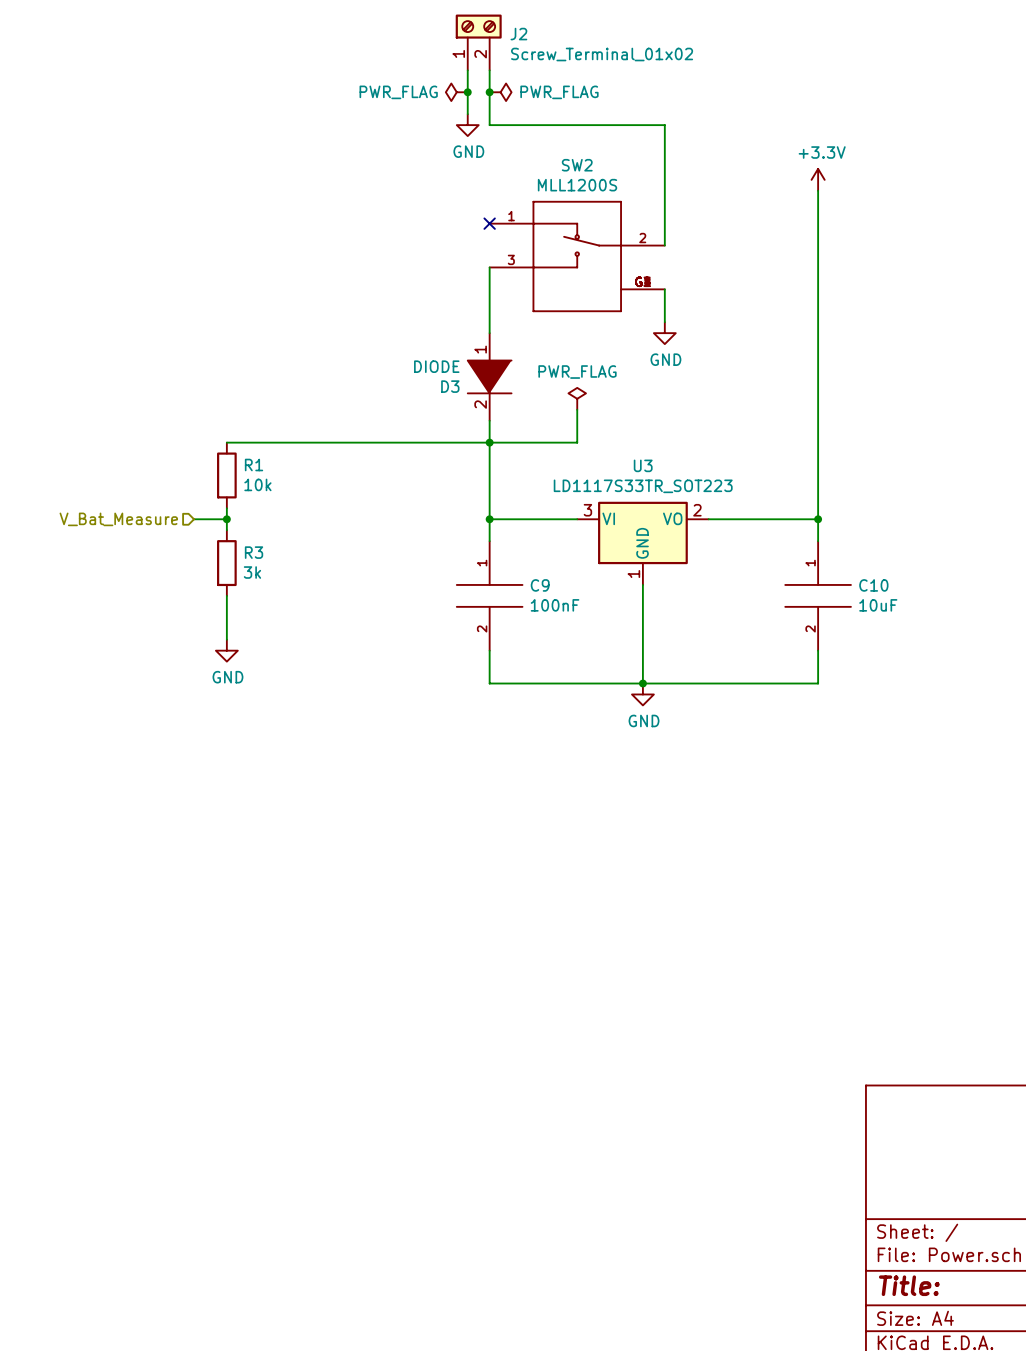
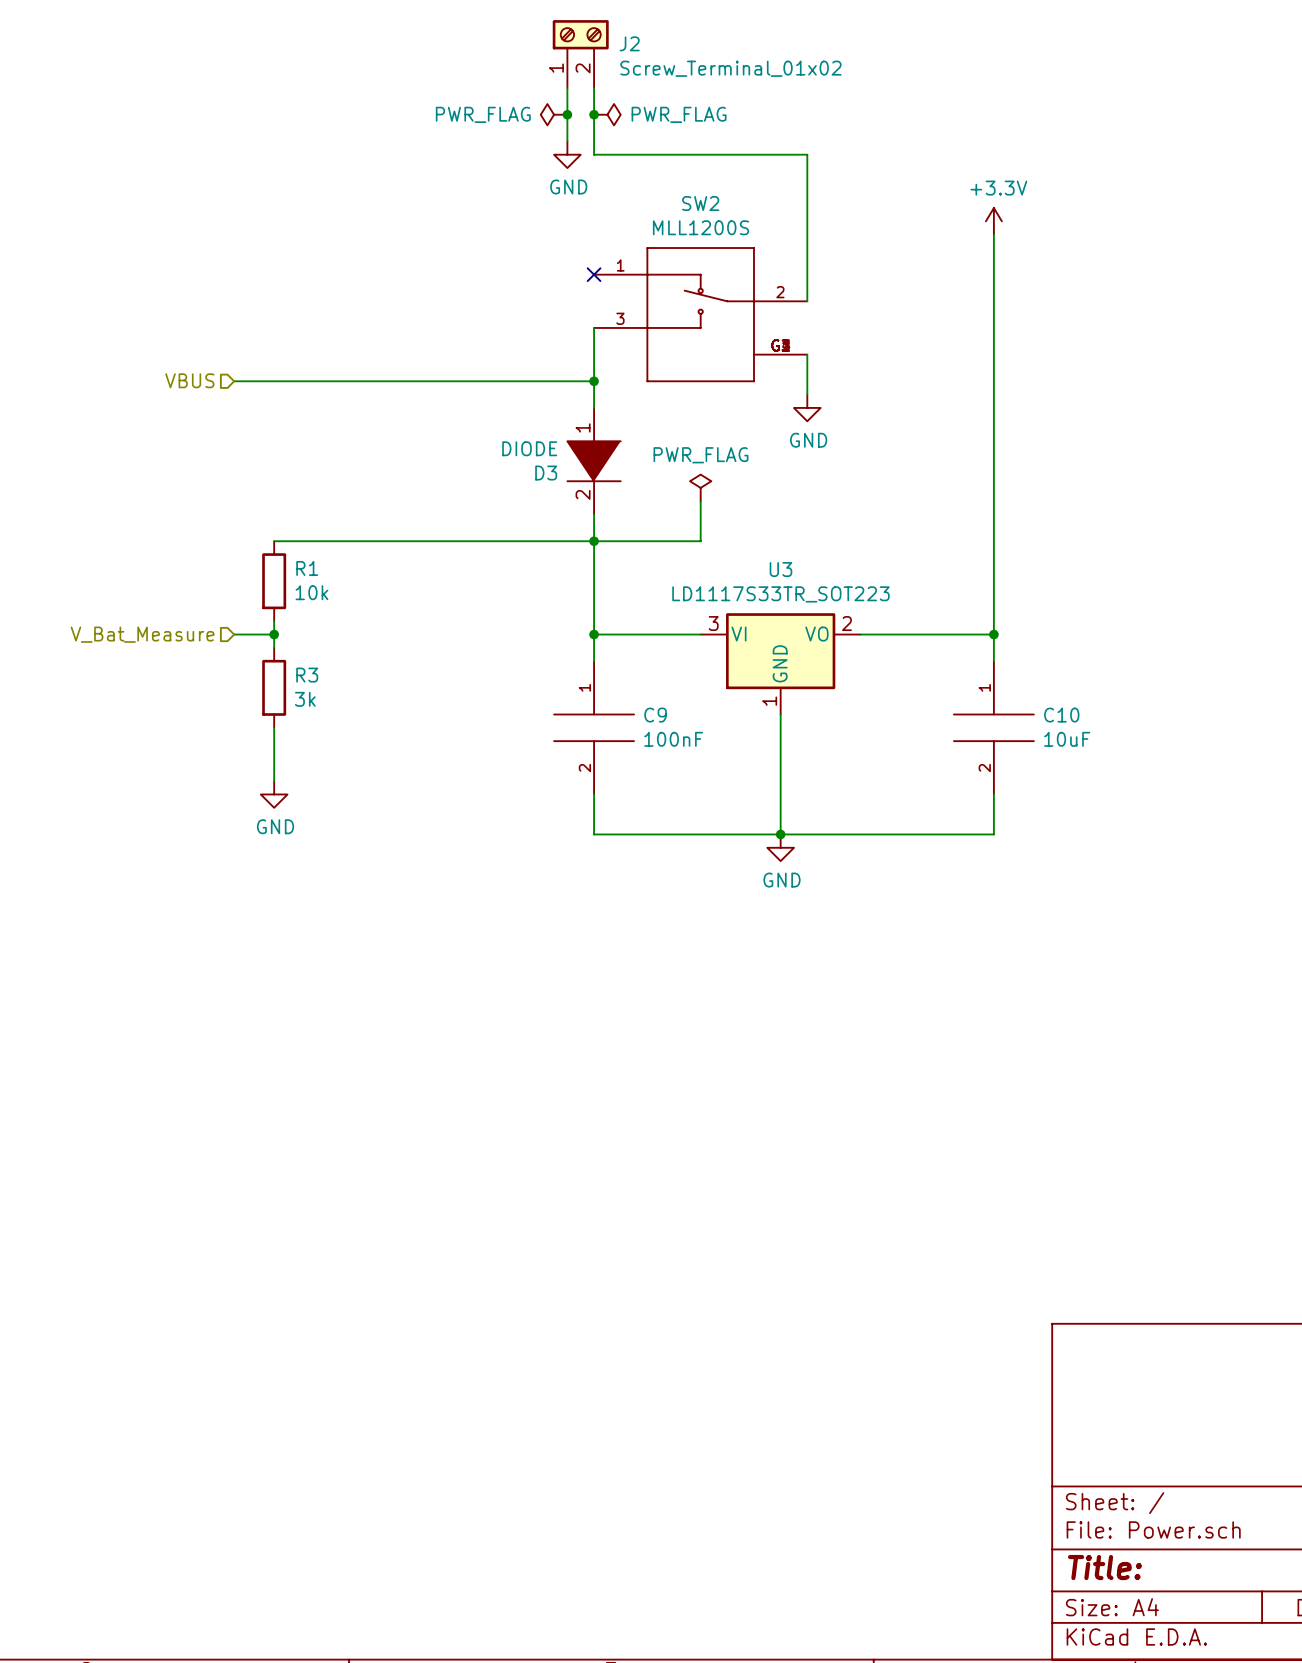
hierarchical label: none -> VBUS (189, 380)
wire: none -> (234, 381) (594, 381)
junction: none -> (594, 381)

